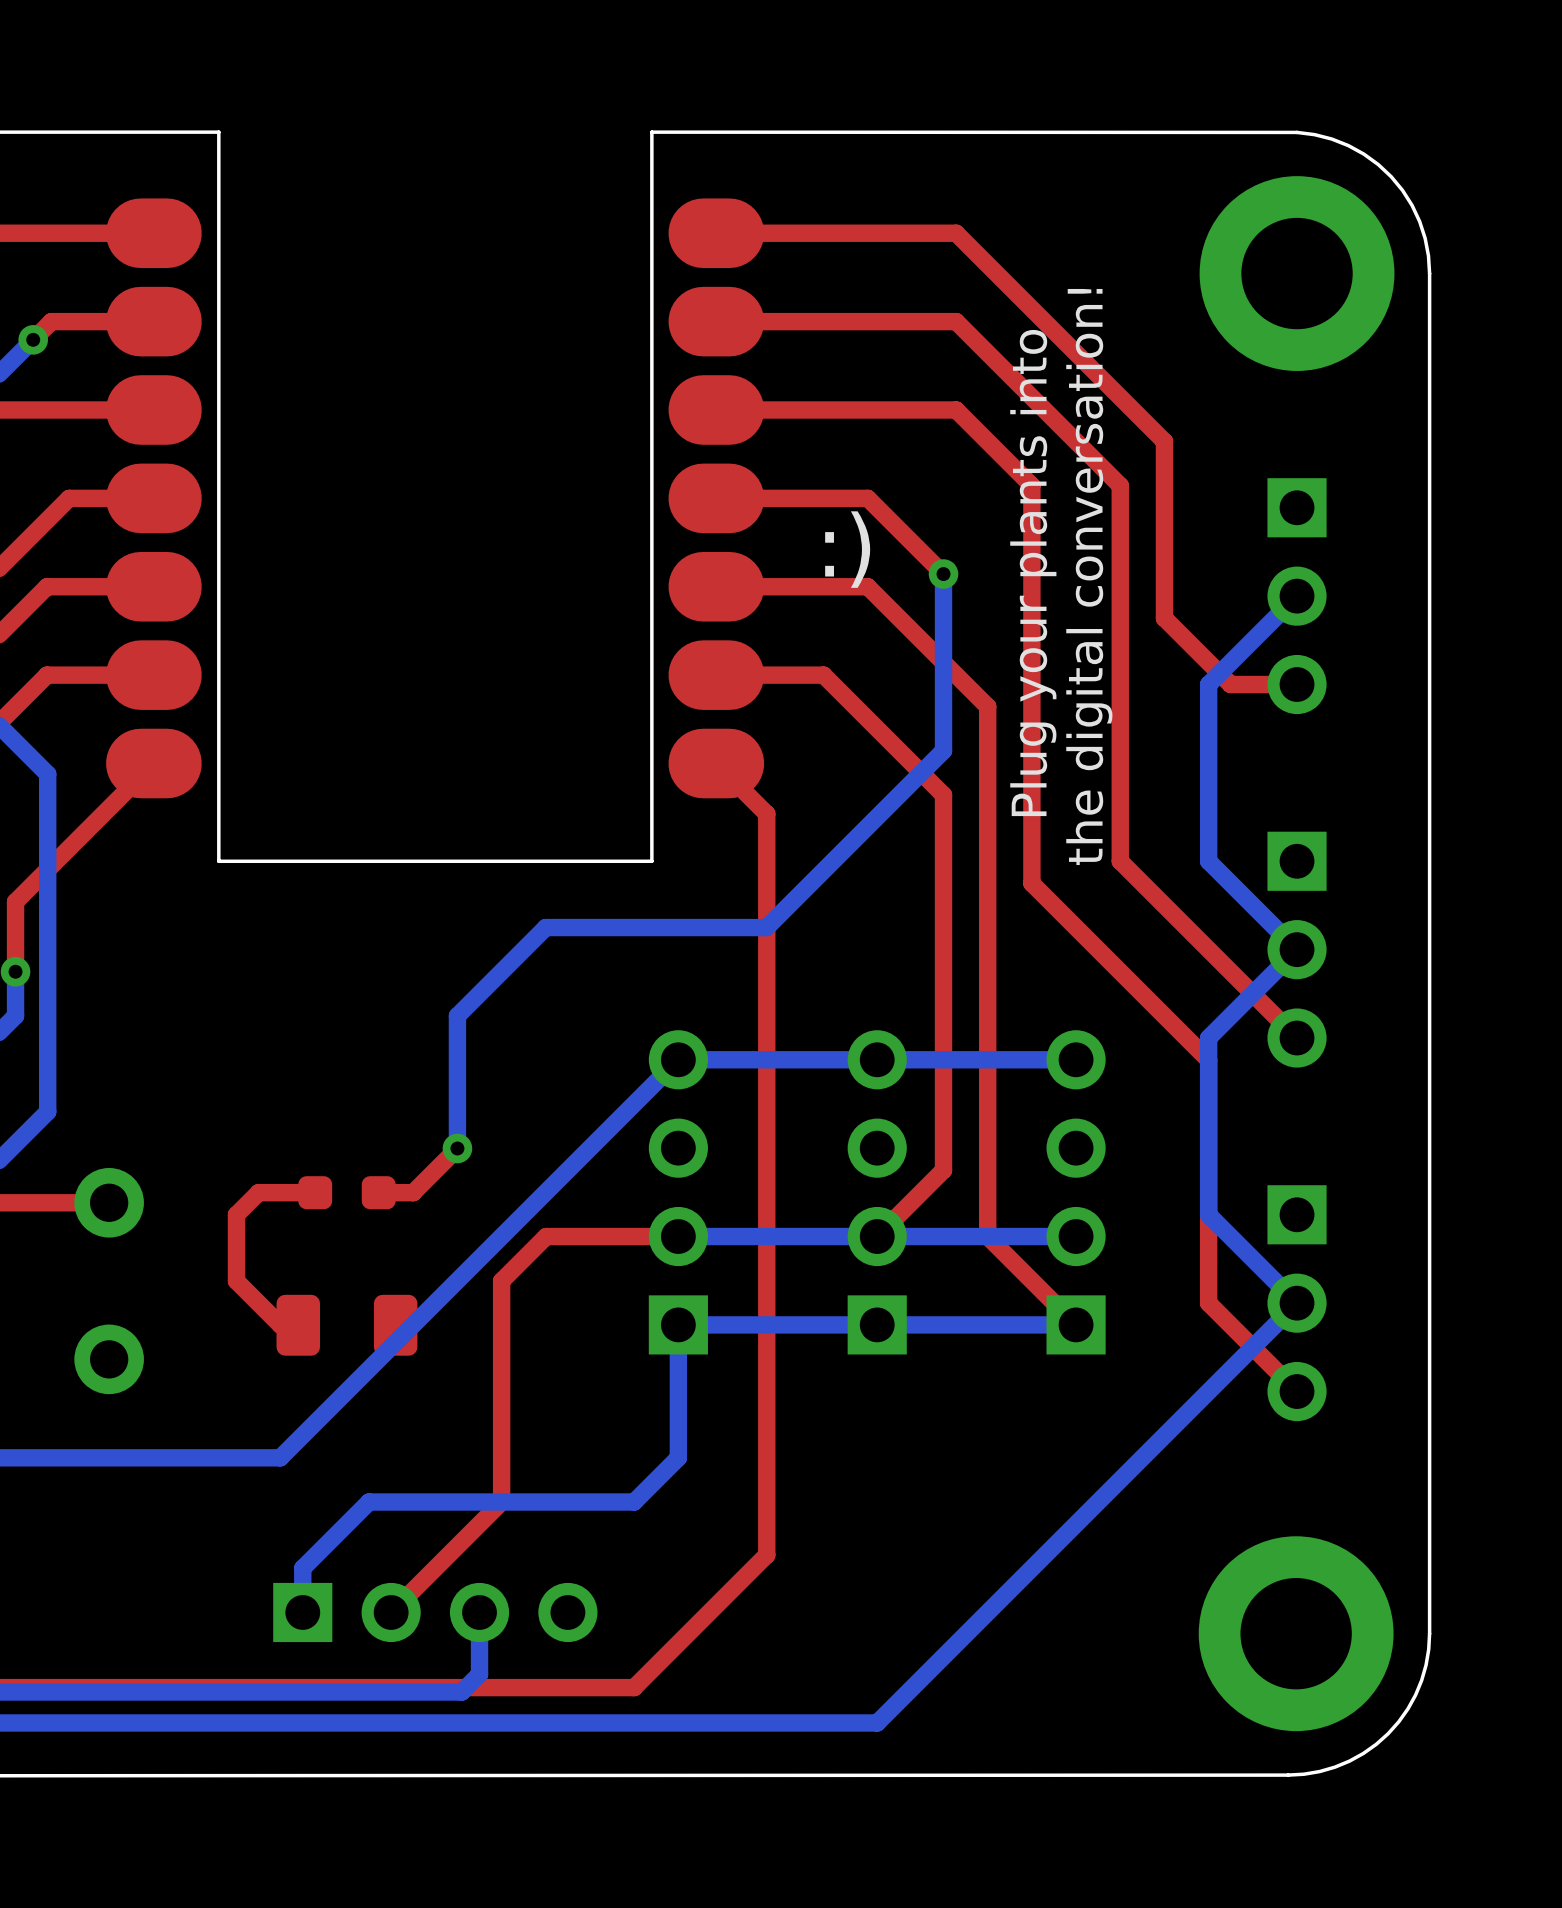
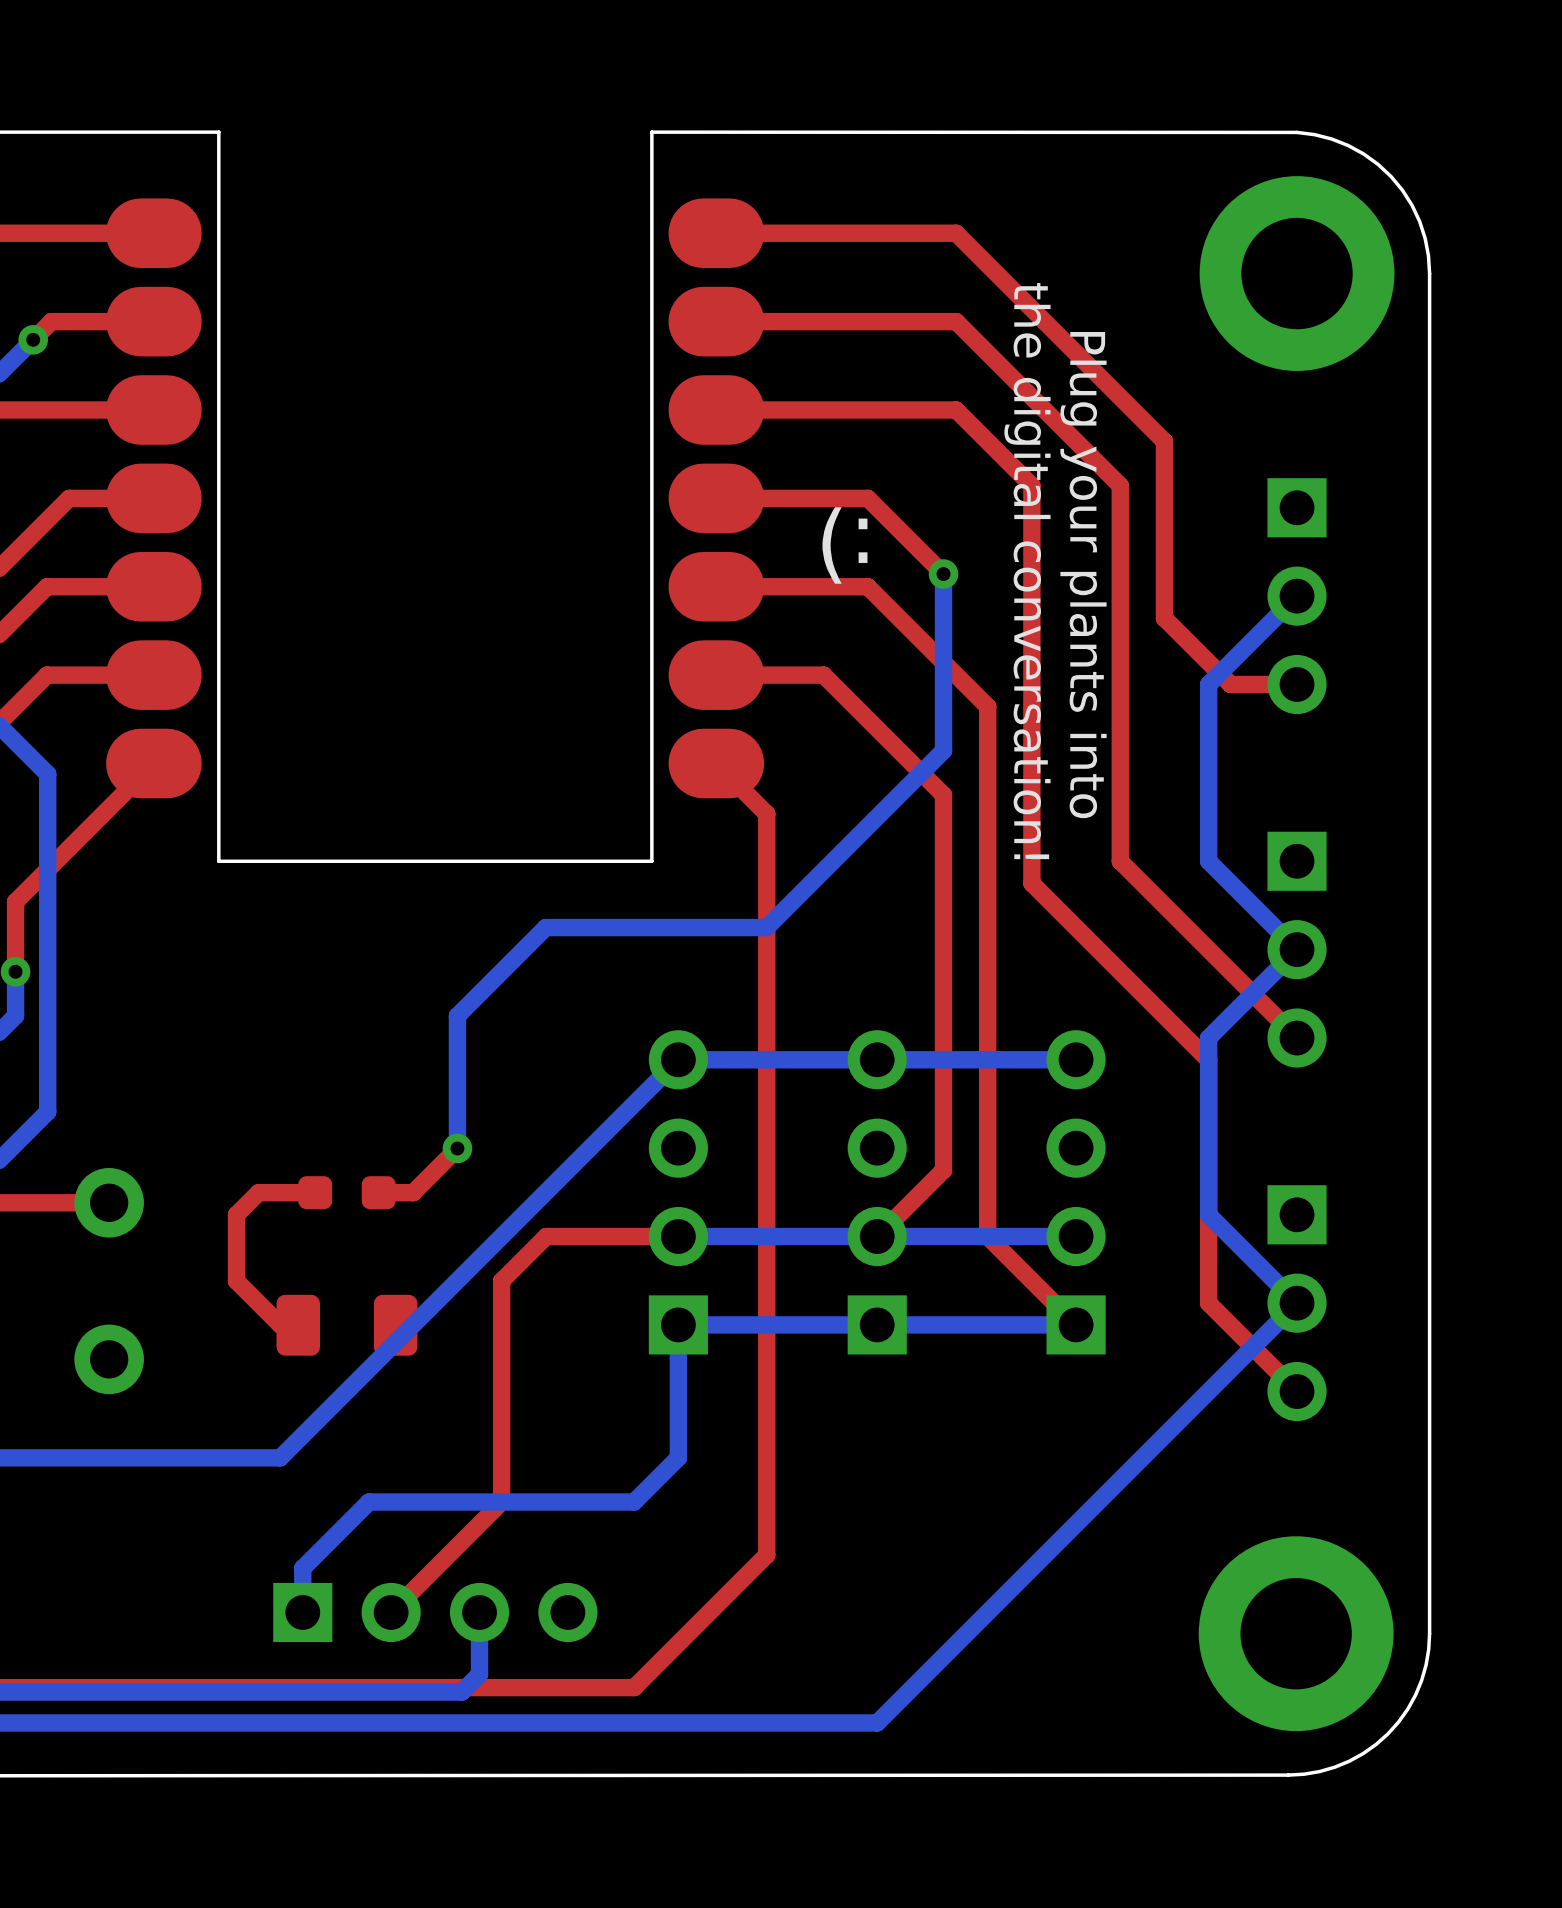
text rotation: 0° (847, 549) -> 180° (844, 545)
text: Plug your plants into (1033, 573) -> the digital conversation! (1027, 571)
text: the digital conversation! (1089, 577) -> Plug your plants into (1083, 575)

